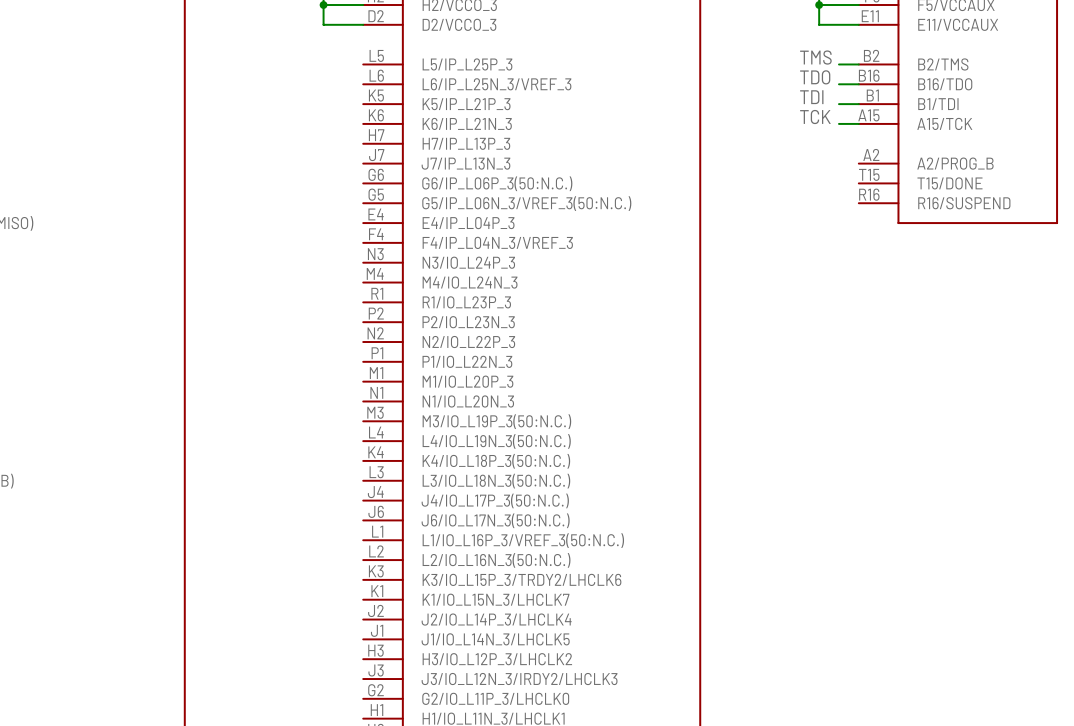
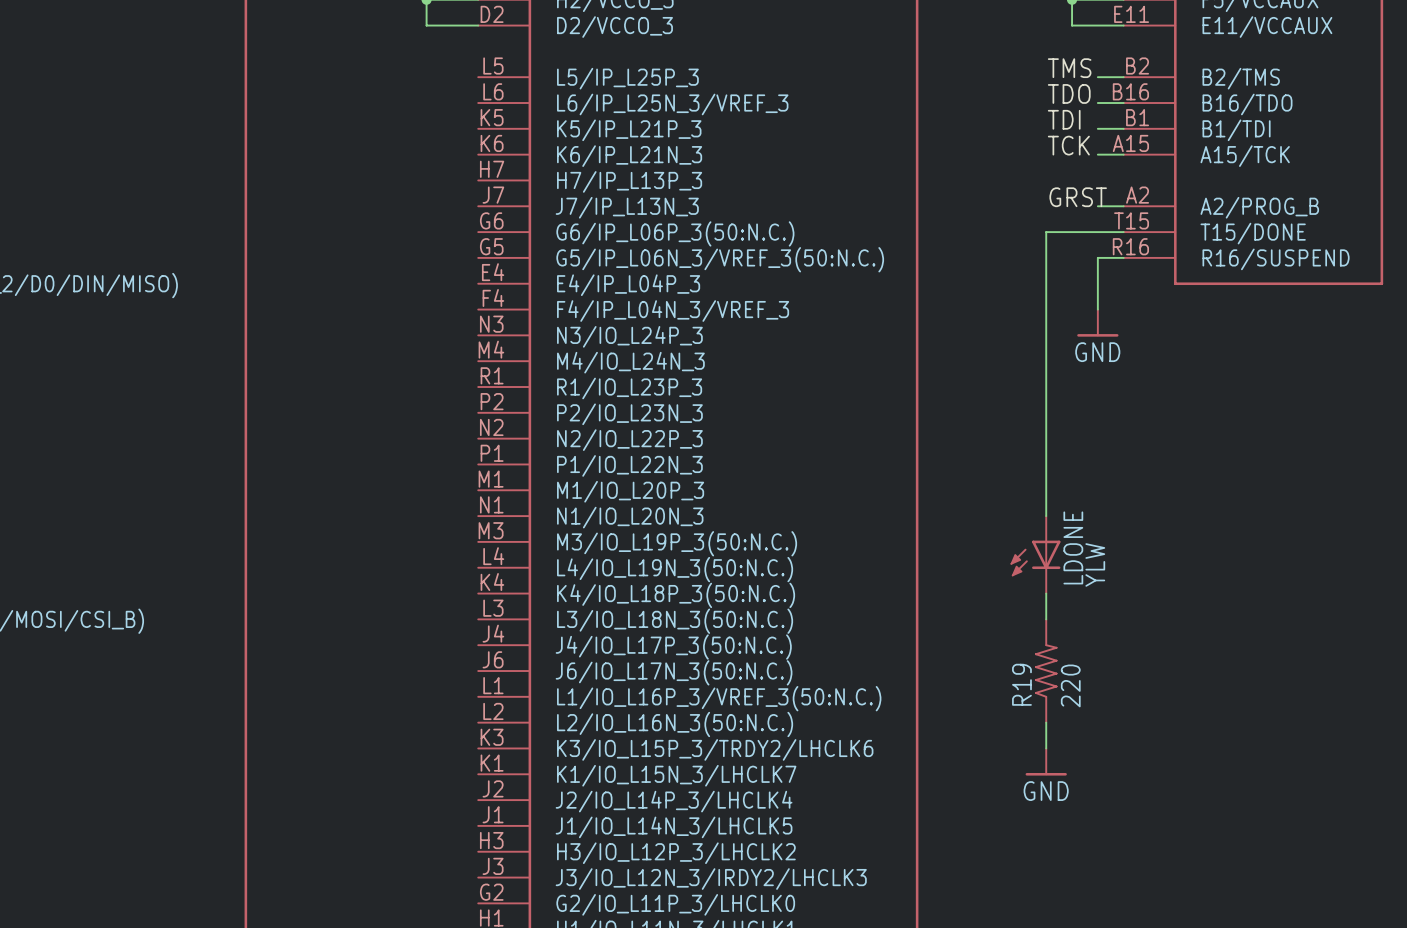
label: none -> GRST (1078, 197)
wire: none -> (1097, 206) (1123, 206)
wire: none -> (1123, 232) (1046, 232) (1046, 516)
wire: none -> (1123, 257) (1097, 257) (1097, 309)
power symbol: none -> GND (1097, 323)
LDONE: none -> YLW (1035, 554)
wire: none -> (1046, 593) (1046, 619)
R19: none -> 220 (1046, 671)
wire: none -> (1046, 722) (1046, 748)
power symbol: none -> GND (1046, 762)

